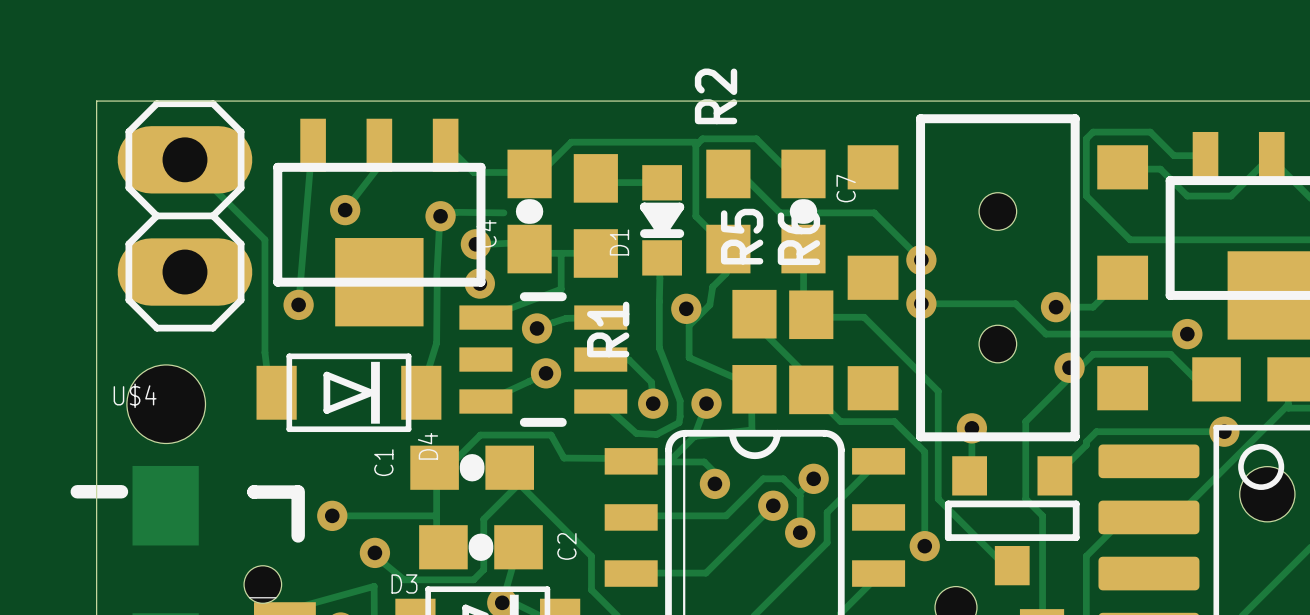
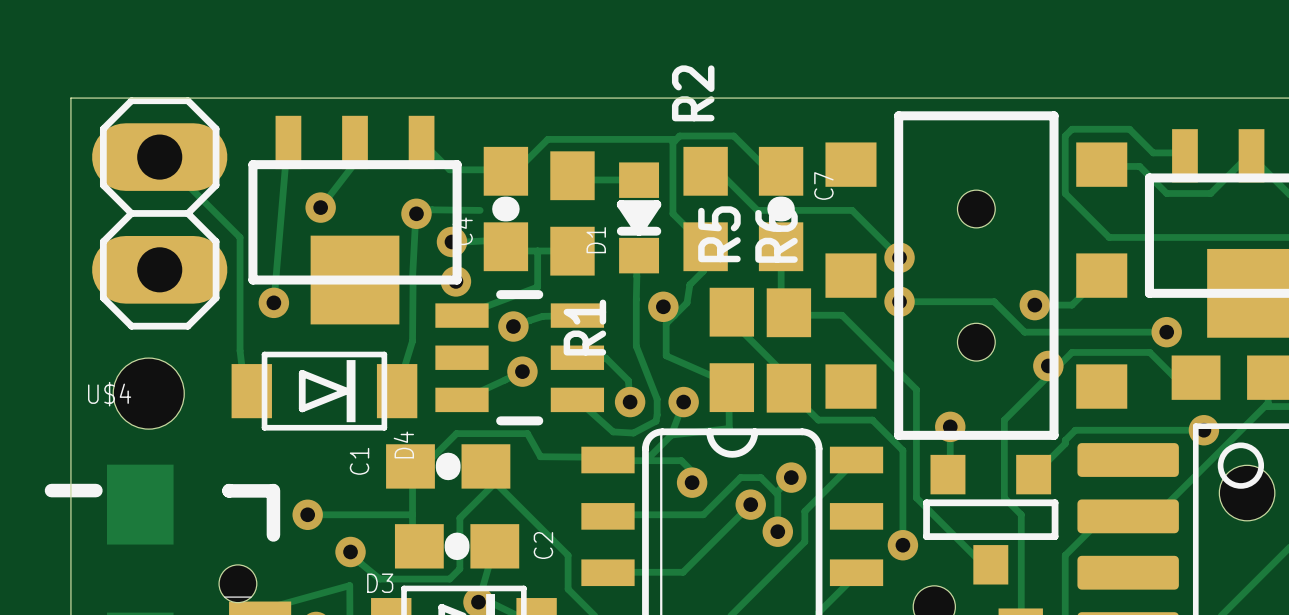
hole size: [126, 364, 206, 444] -> [113, 358, 185, 430]

